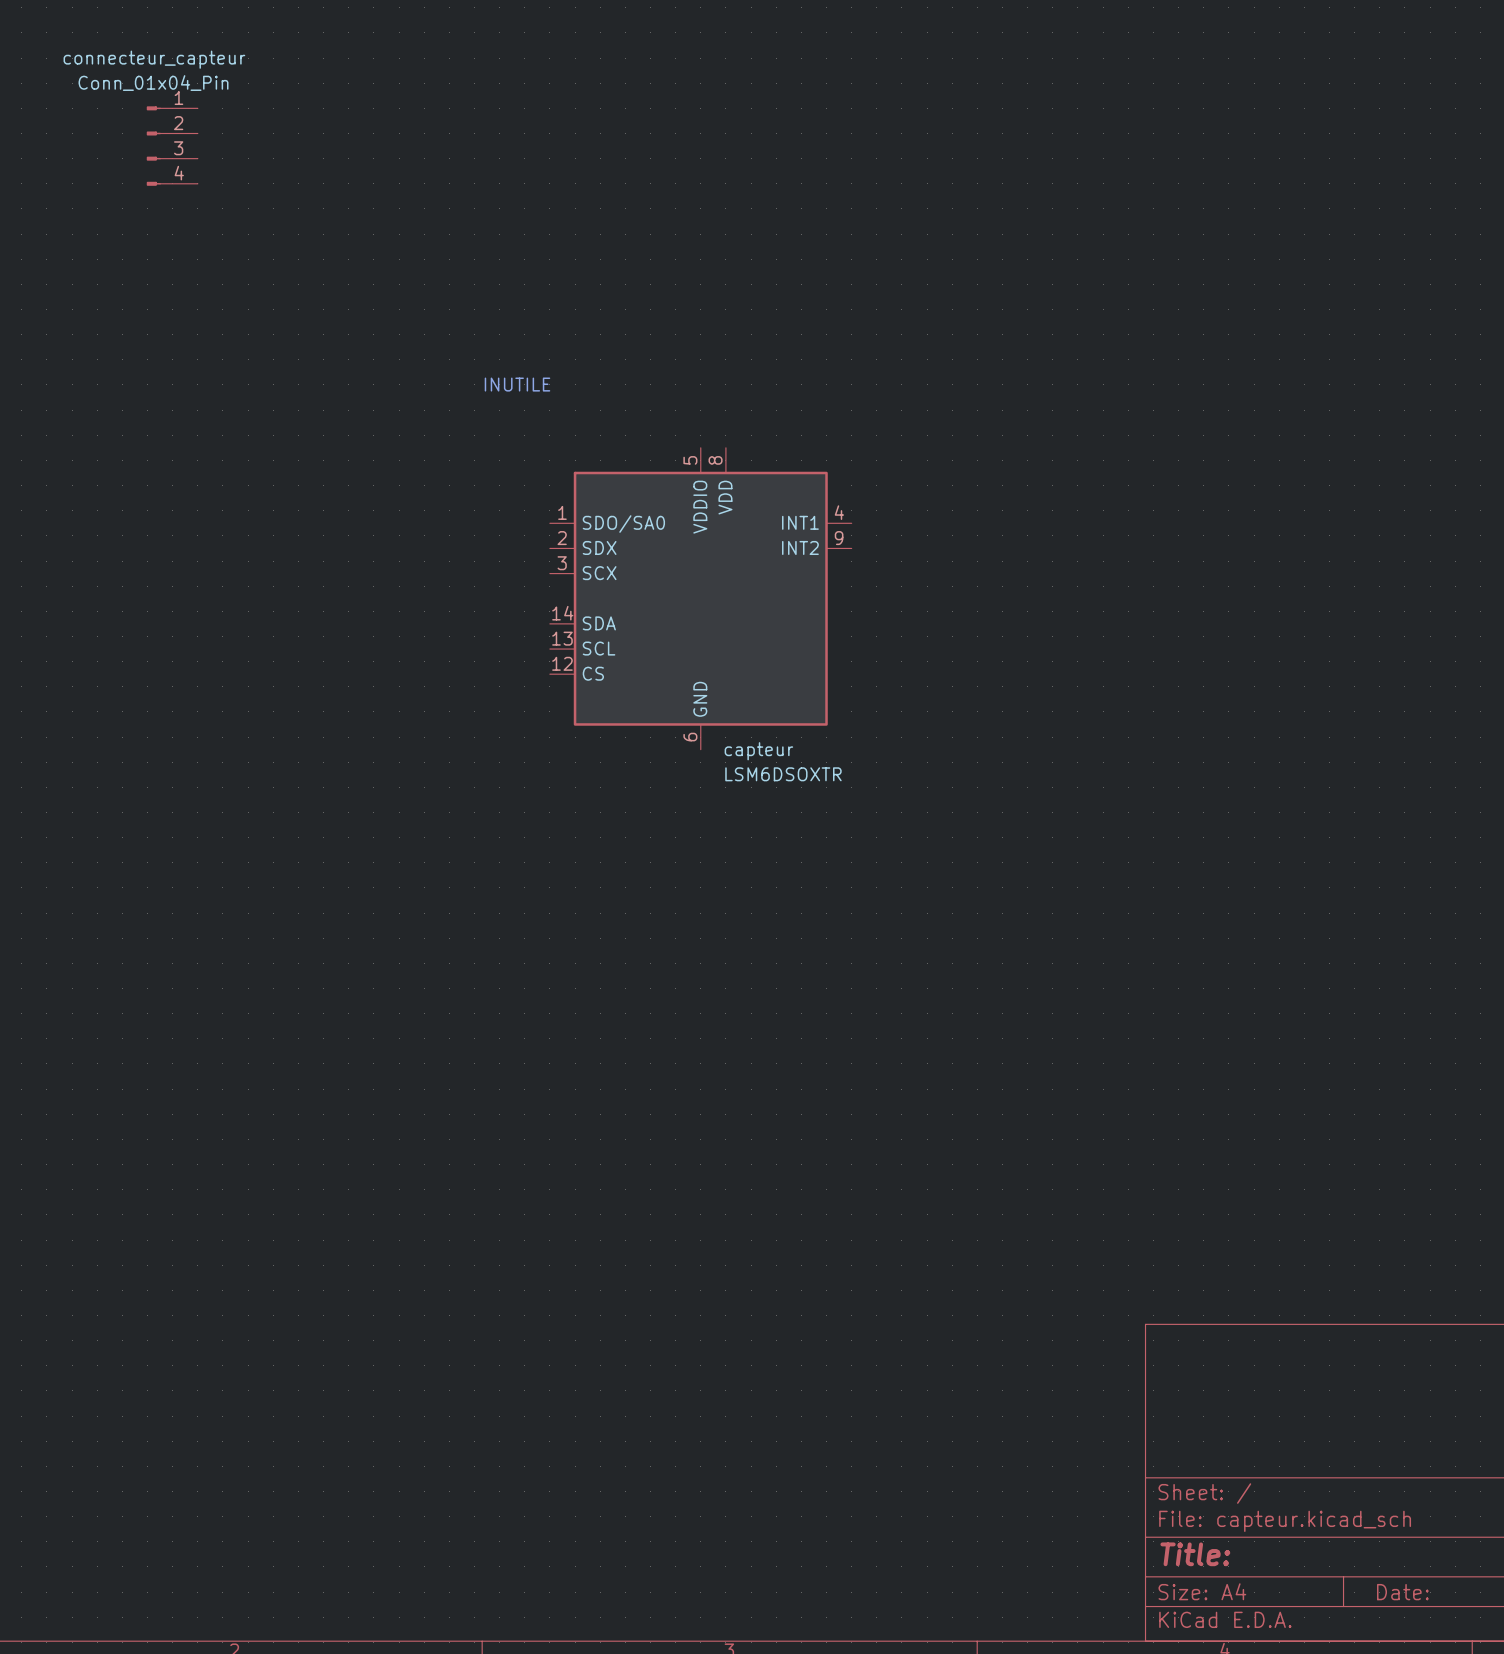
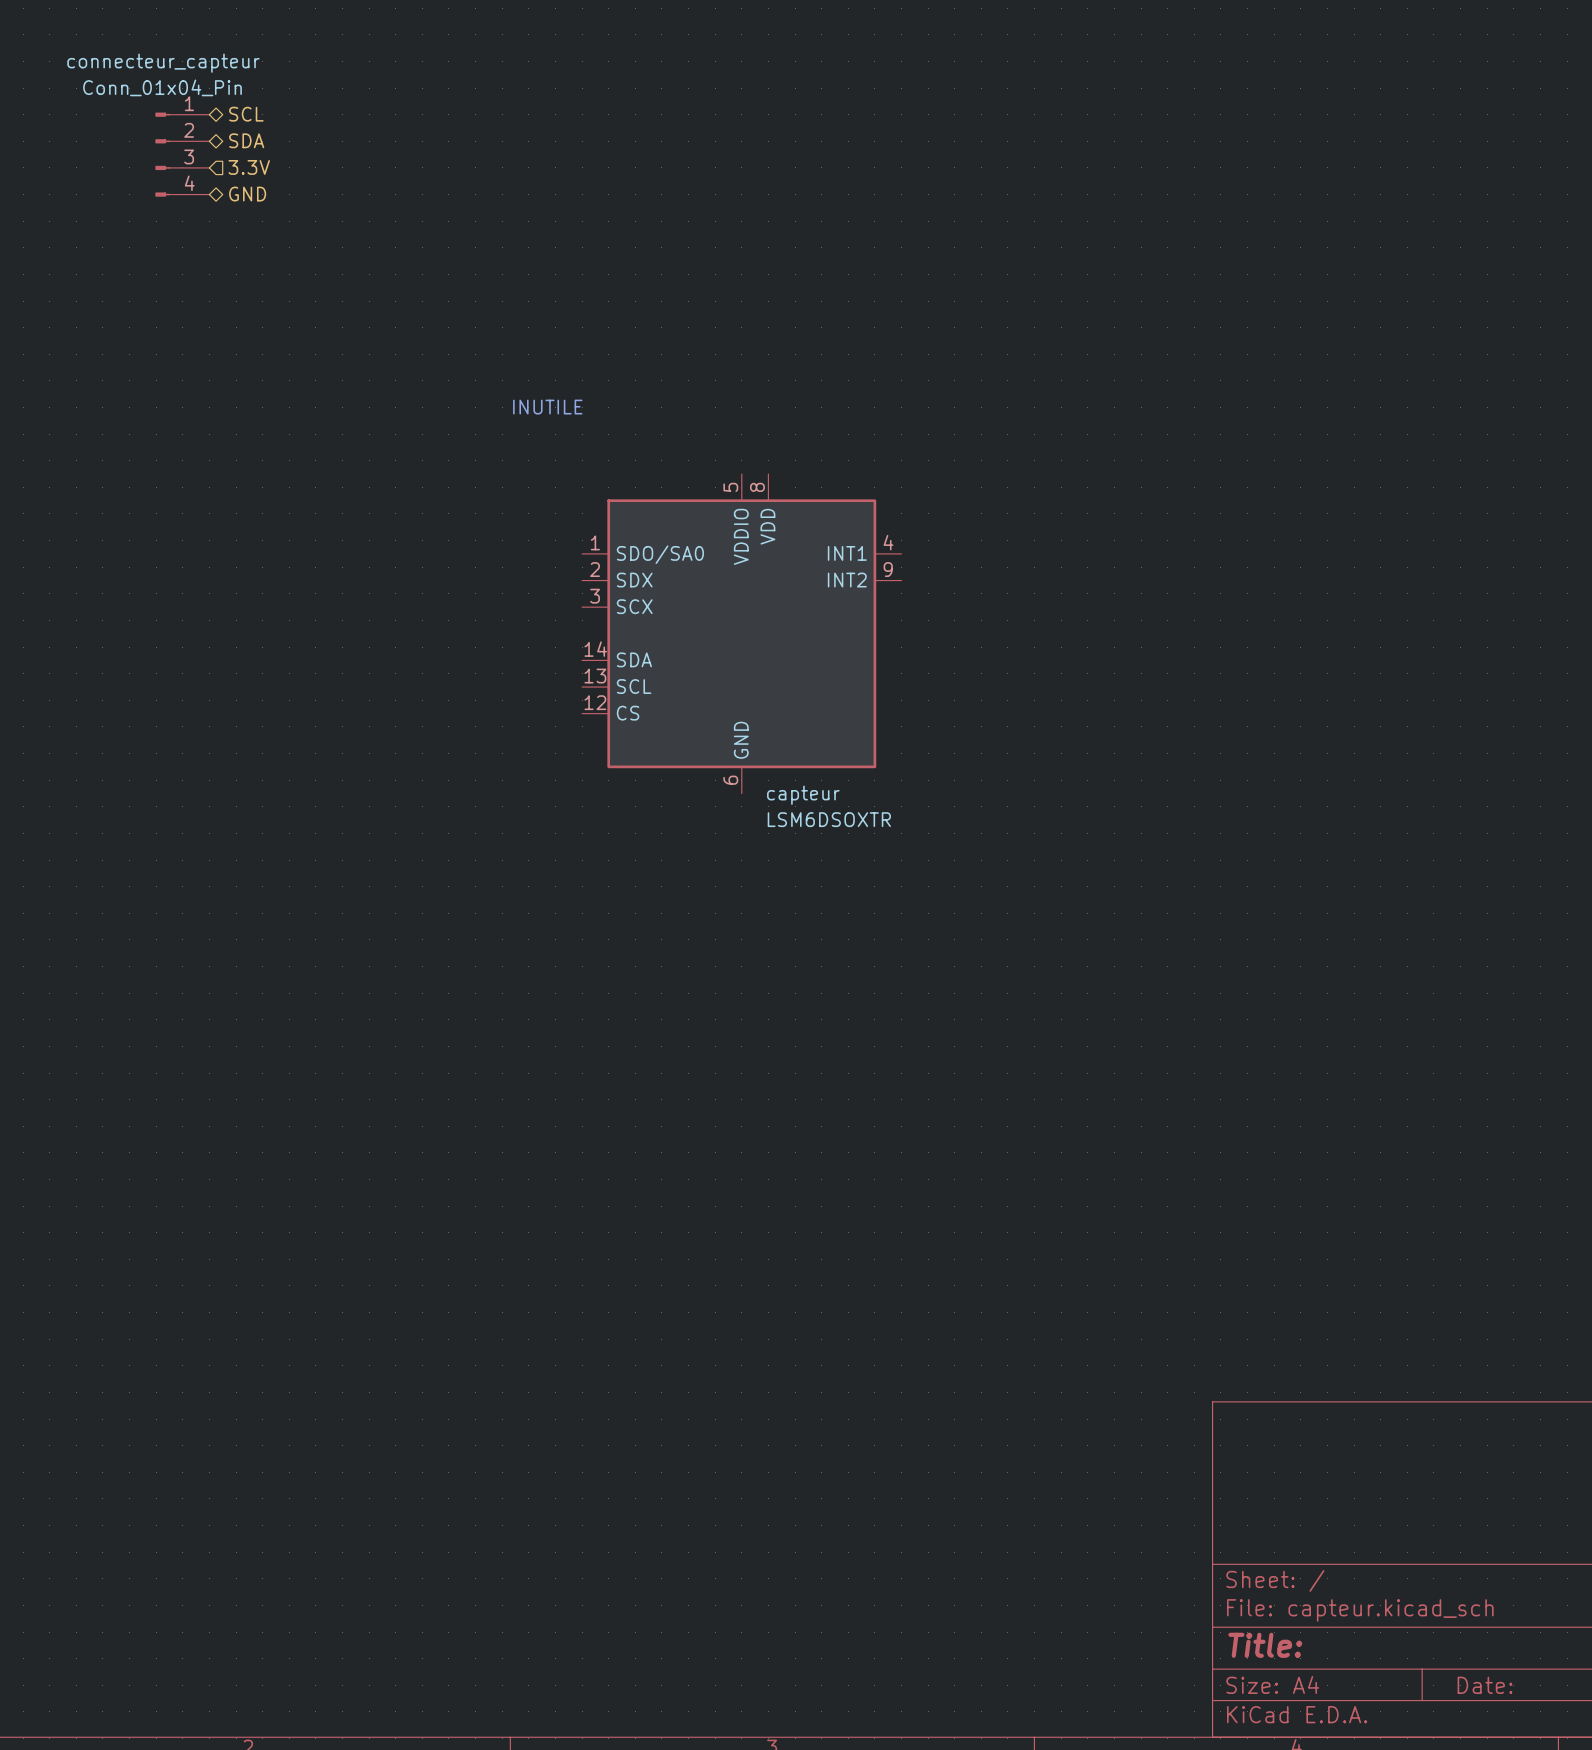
hierarchical label: none -> SCL (246, 114)
hierarchical label: none -> SDA (246, 140)
hierarchical label: none -> 3.3V (249, 167)
hierarchical label: none -> GND (247, 194)

